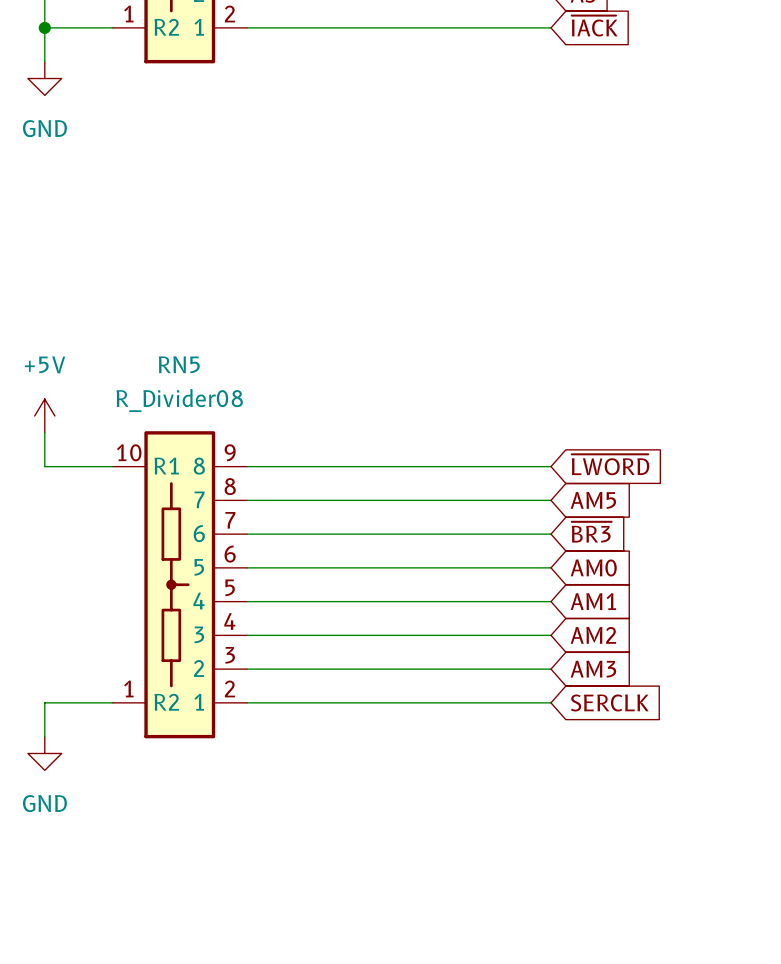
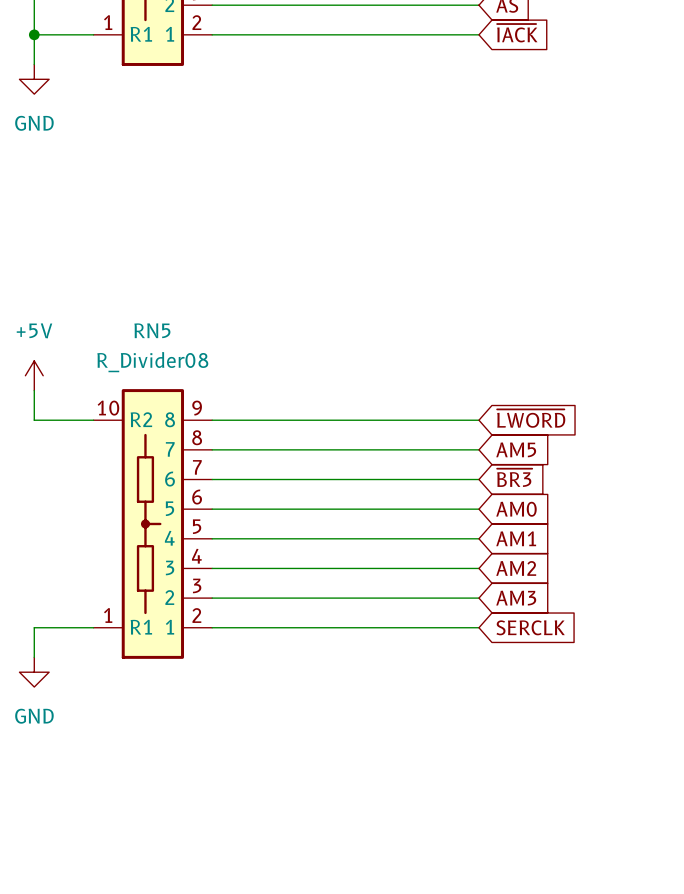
part pin name: R2 (166, 27) -> R1 (141, 34)
RN5 pin name: R1 (166, 466) -> R2 (141, 419)
RN5 pin name: R2 (166, 702) -> R1 (141, 627)

